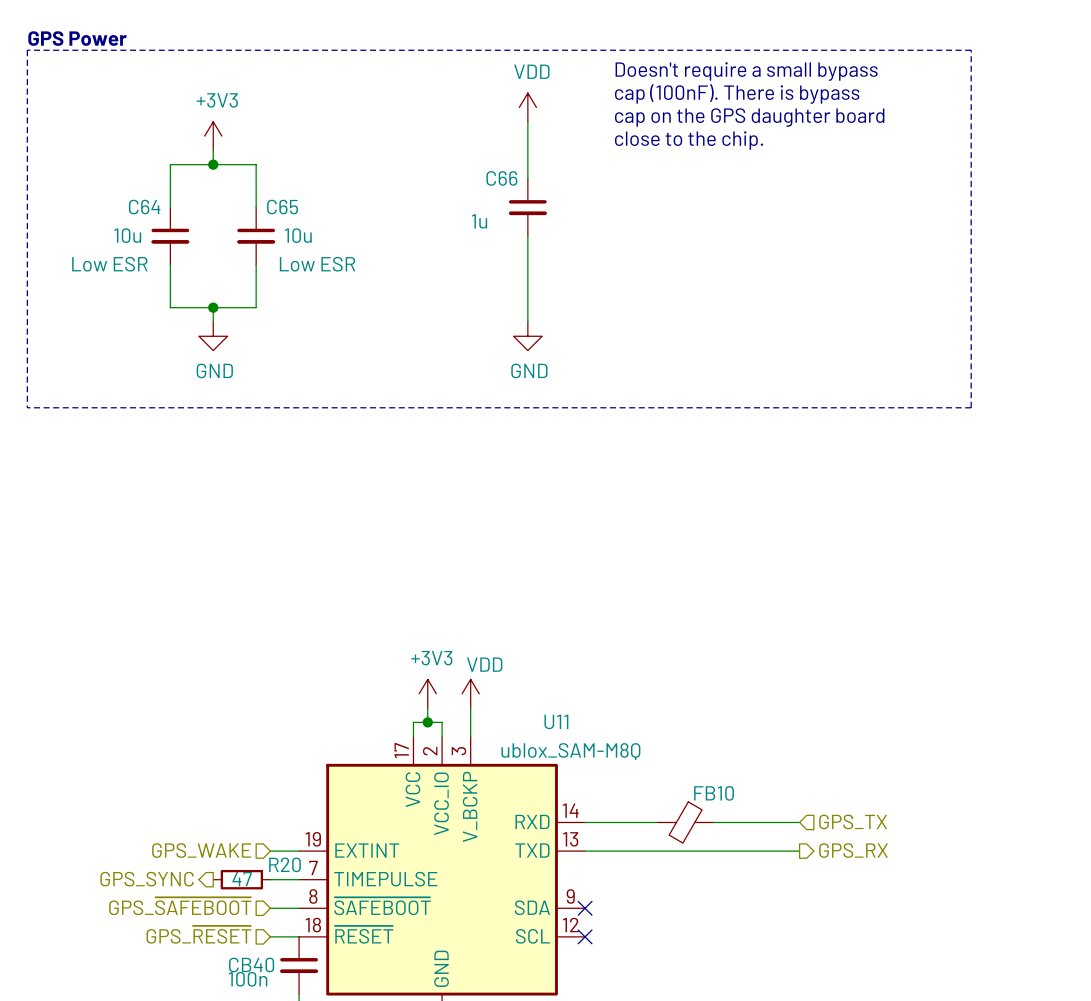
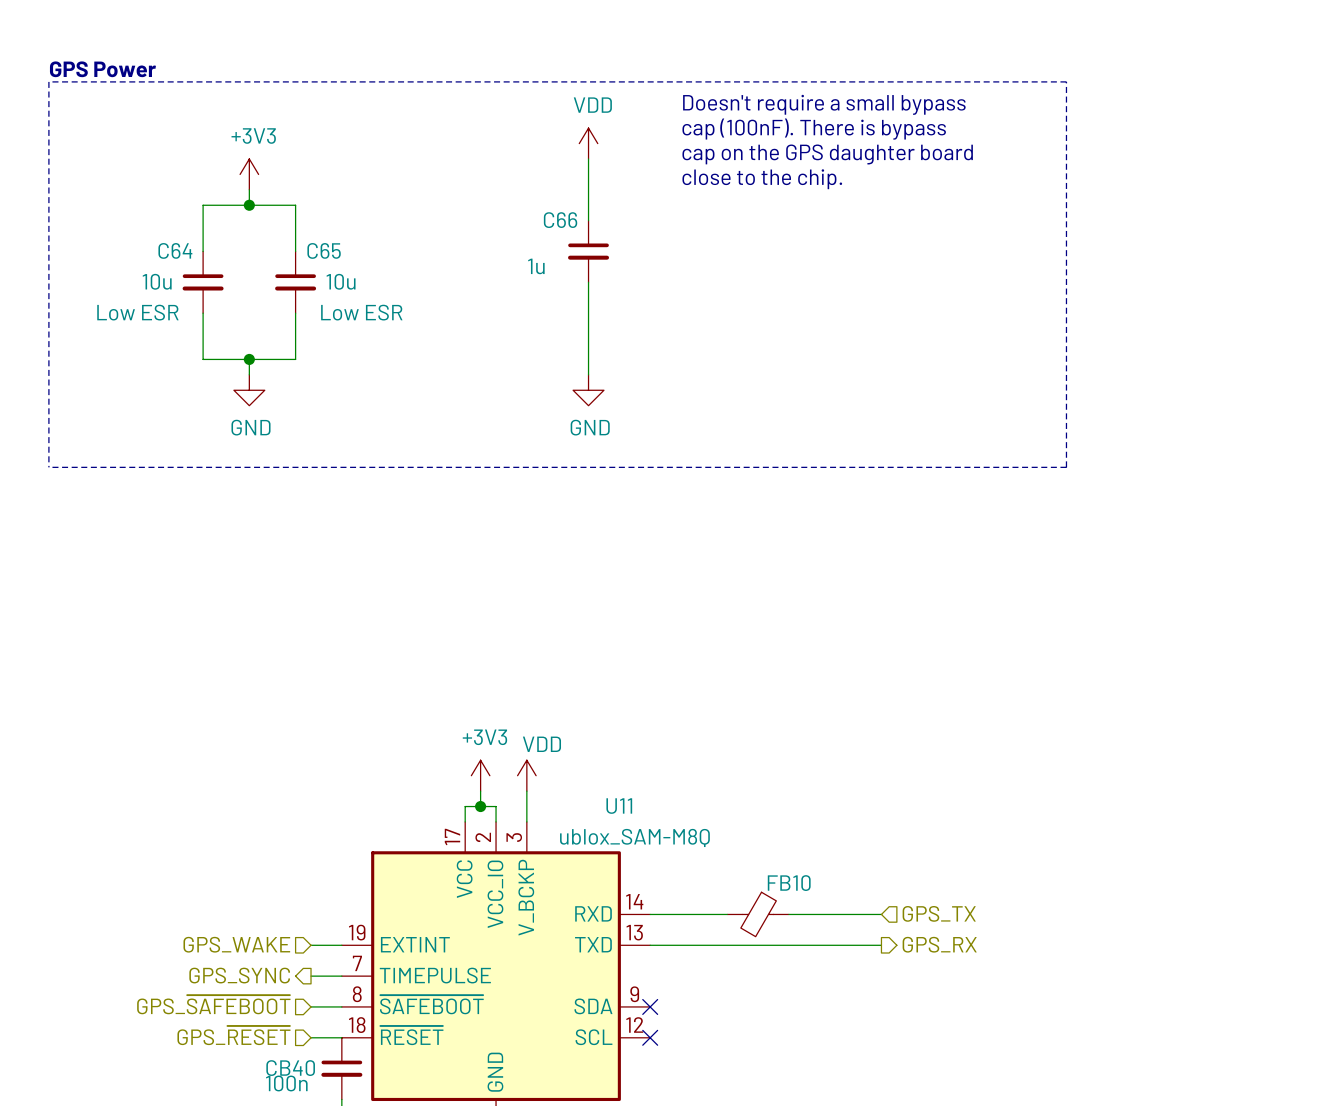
hierarchical label position: GPS_SYNC (147, 879) -> GPS_SYNC (239, 975)
R20: 47 (241, 879) -> none

